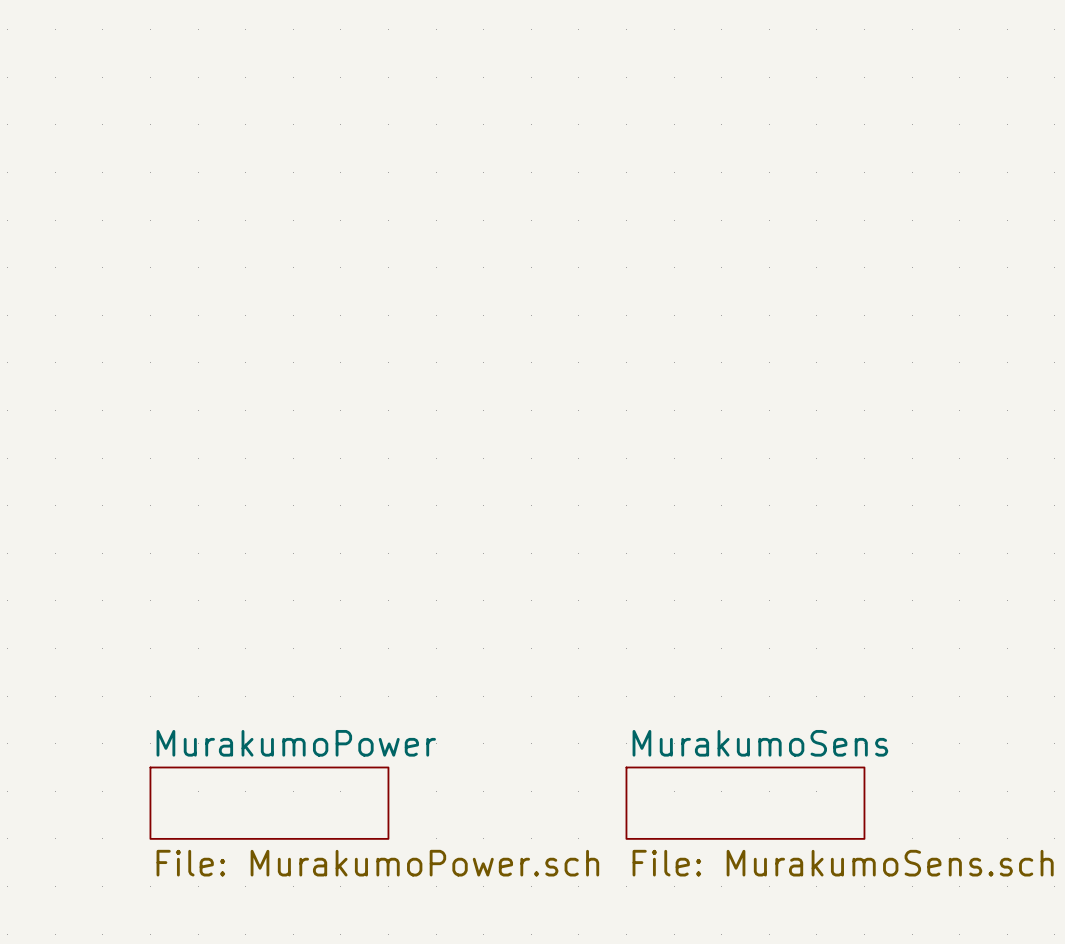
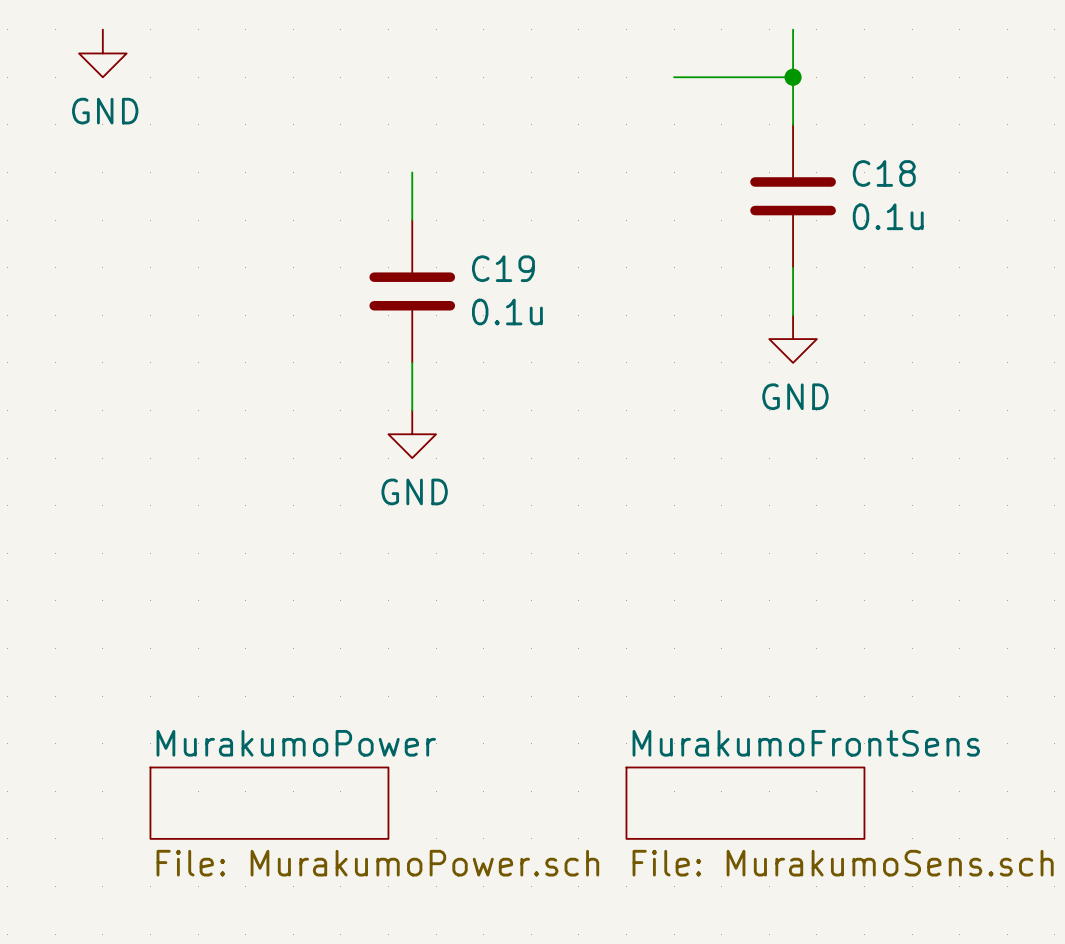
wire: none -> (793, 29) (793, 124)
power symbol: none -> GND (102, 53)
wire: none -> (674, 77) (793, 77)
junction: none -> (793, 77)
wire: none -> (412, 172) (412, 220)
C18: none -> 0.1u (793, 196)
wire: none -> (793, 267) (793, 315)
C19: none -> 0.1u (412, 291)
power symbol: none -> GND (793, 339)
wire: none -> (412, 362) (412, 410)
power symbol: none -> GND (412, 434)
sheet MurakumoSens name: MurakumoSens (760, 743) -> MurakumoFrontSens (806, 743)

